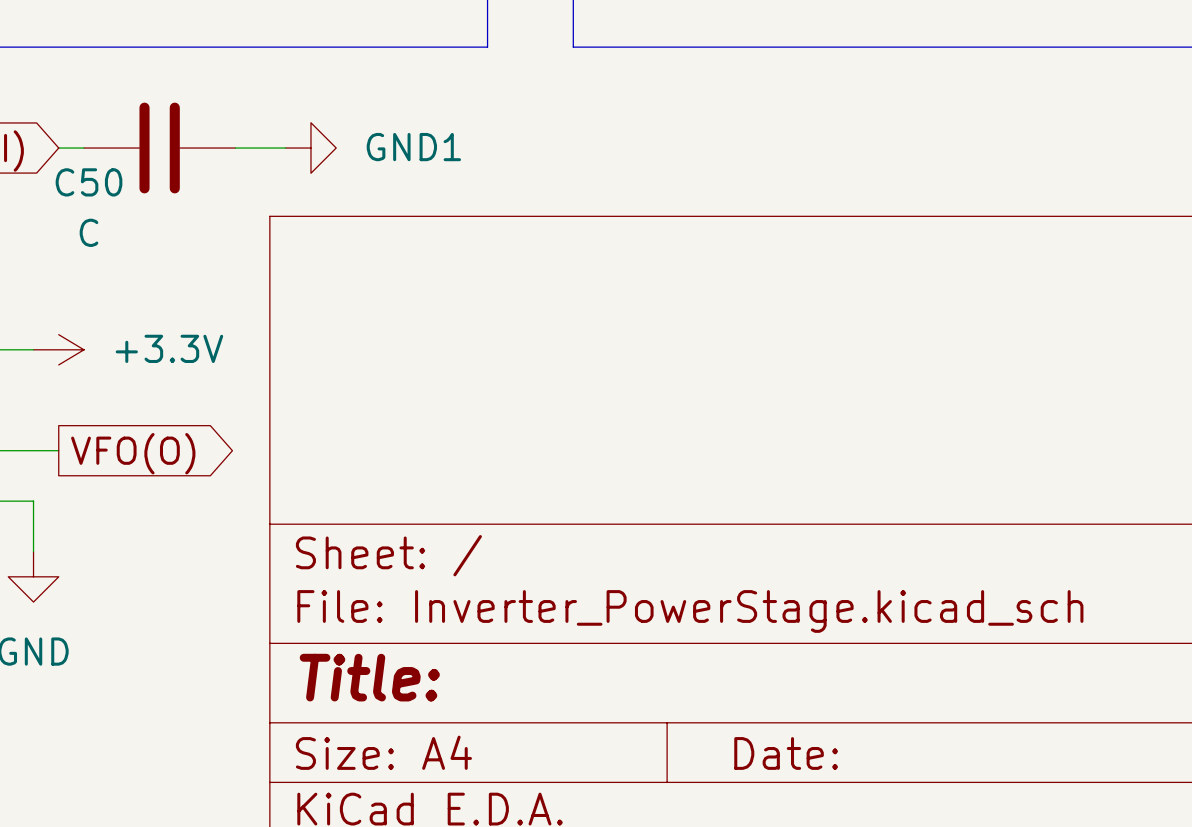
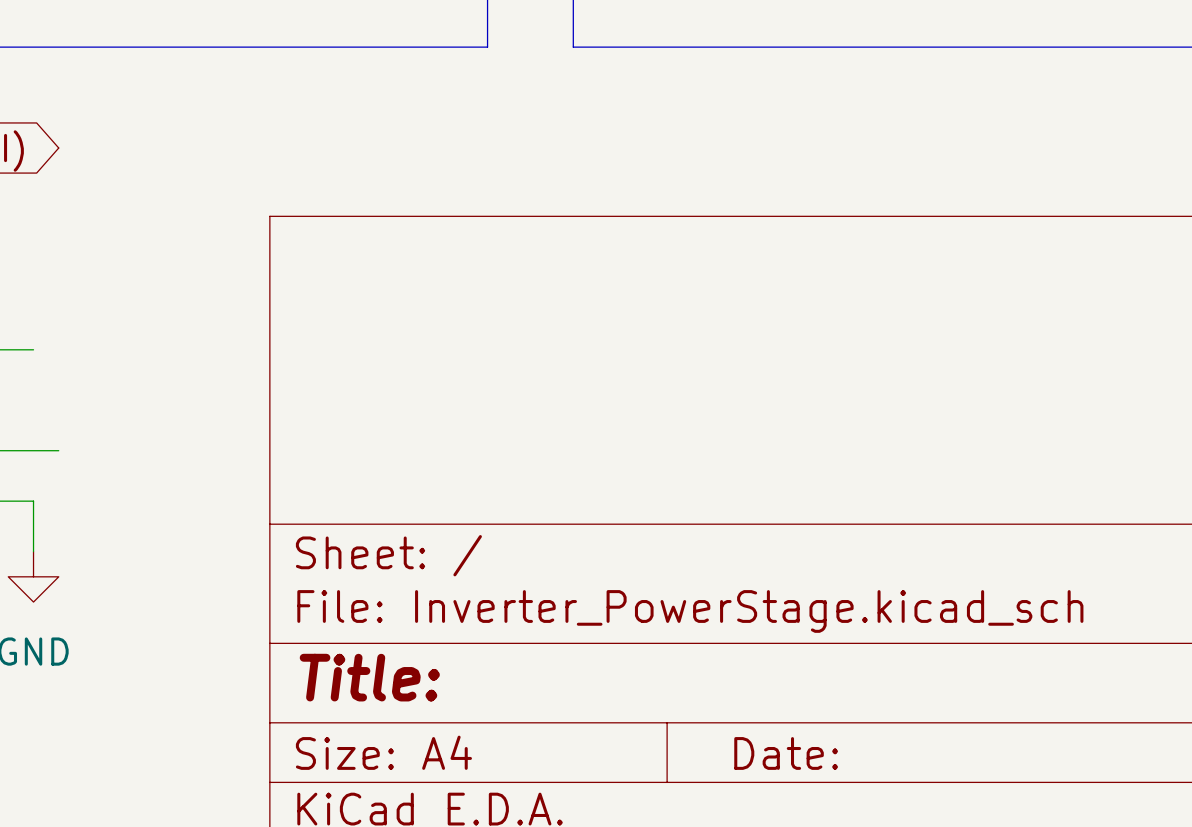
wire: (58, 148) (83, 148) -> none
C50: C (159, 148) -> none
wire: (235, 148) (285, 148) -> none
power symbol: GND1 (310, 148) -> none
power symbol: +3.3V (58, 349) -> none
global label: VFO(O) (133, 453) -> none

